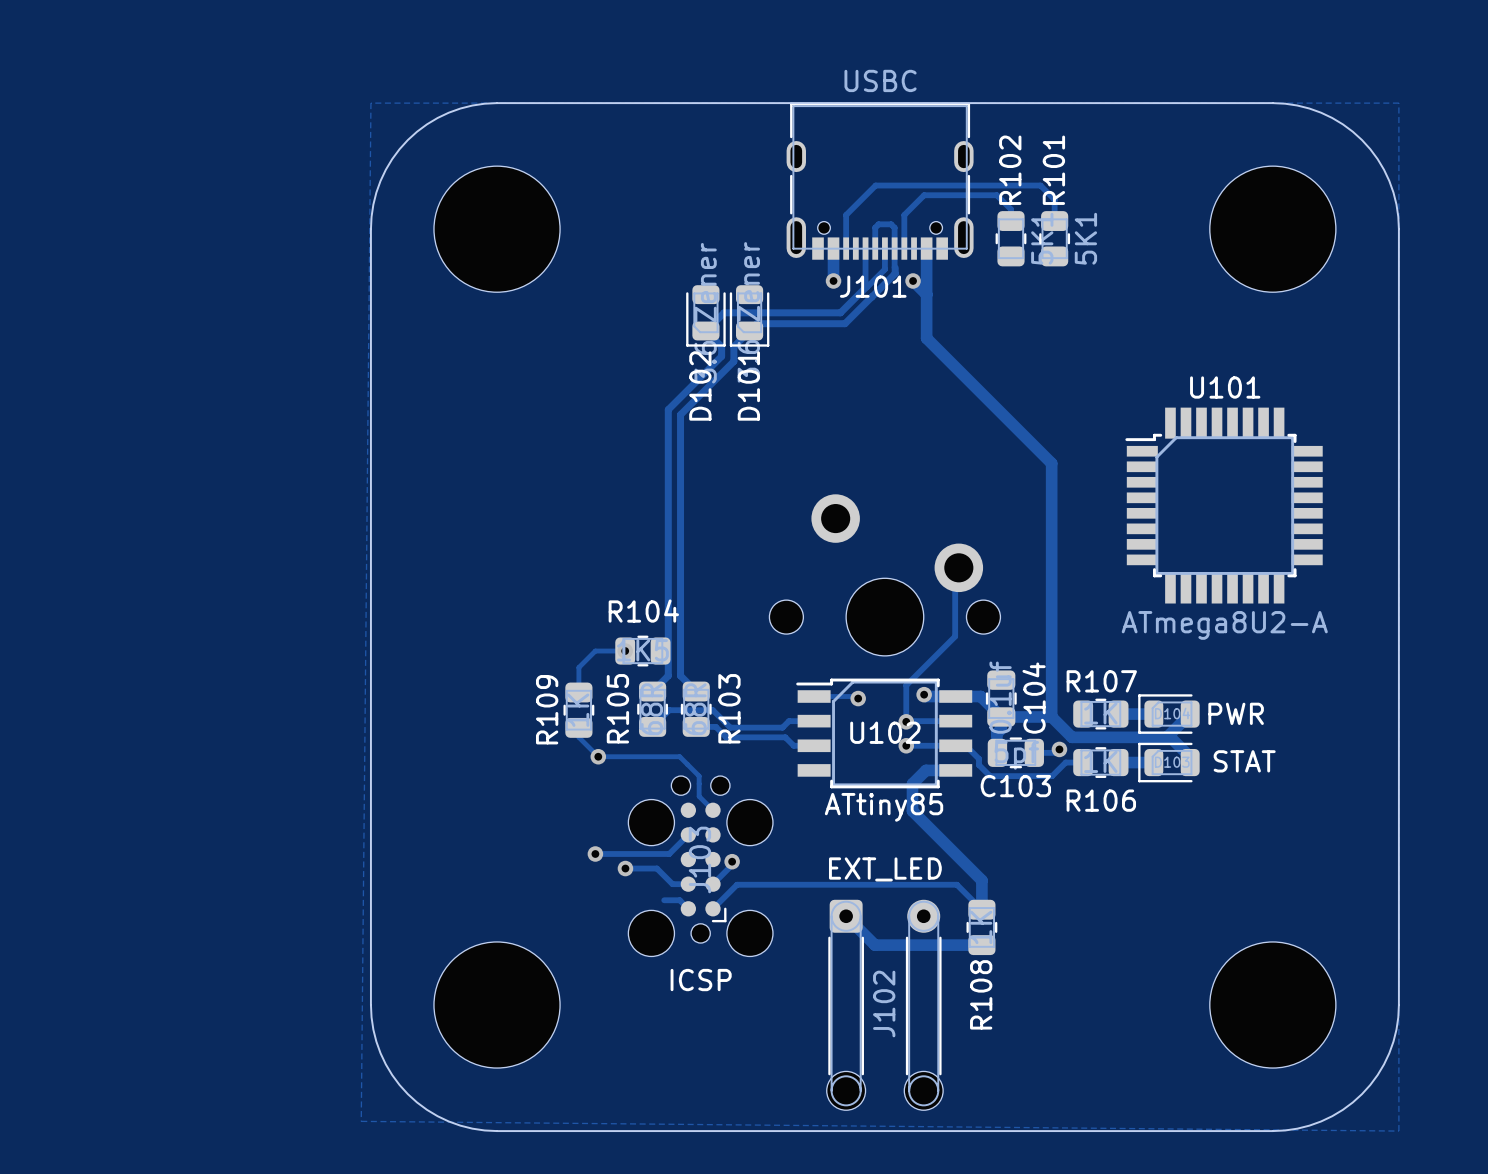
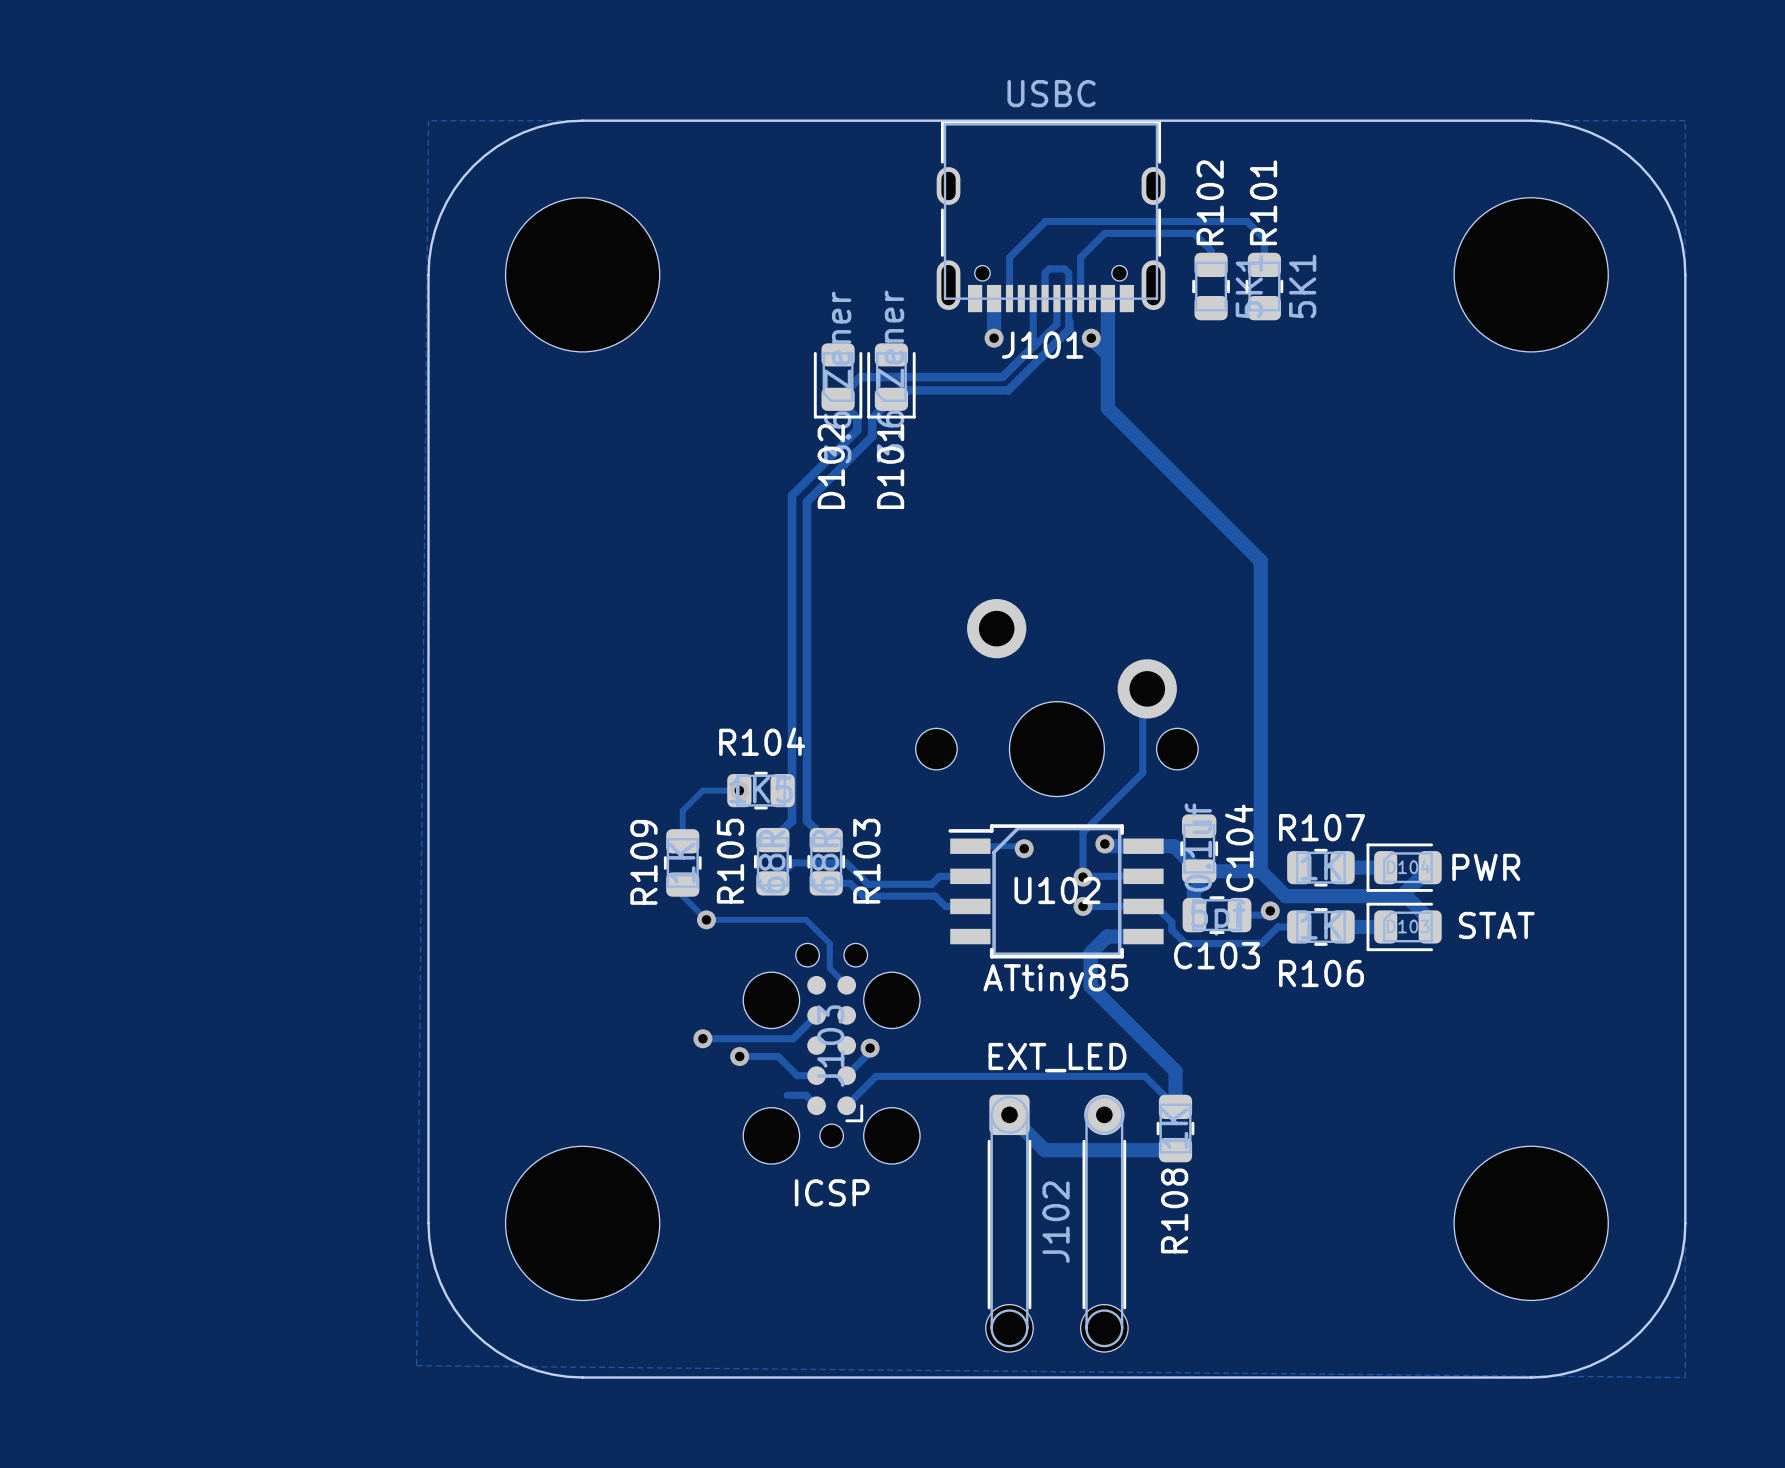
U101: ATmega8U2-A (1224, 505) -> none

